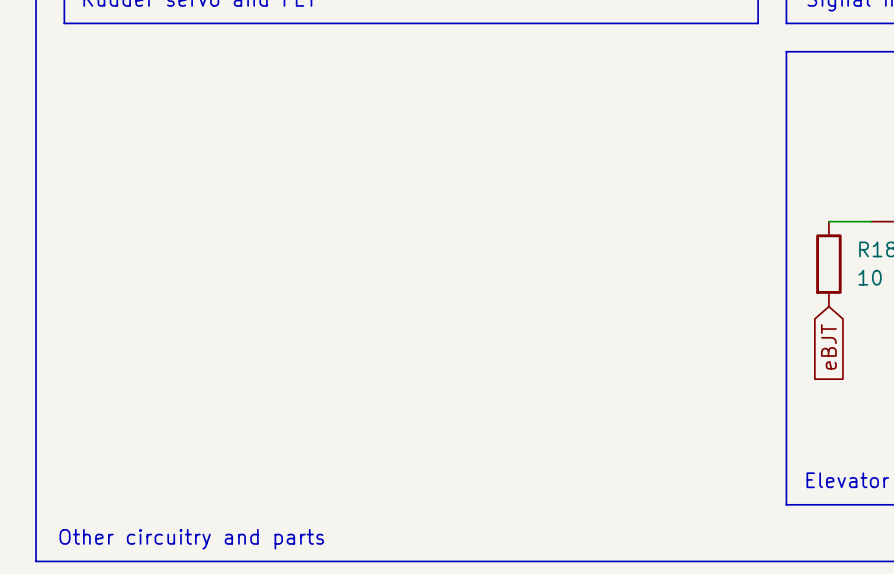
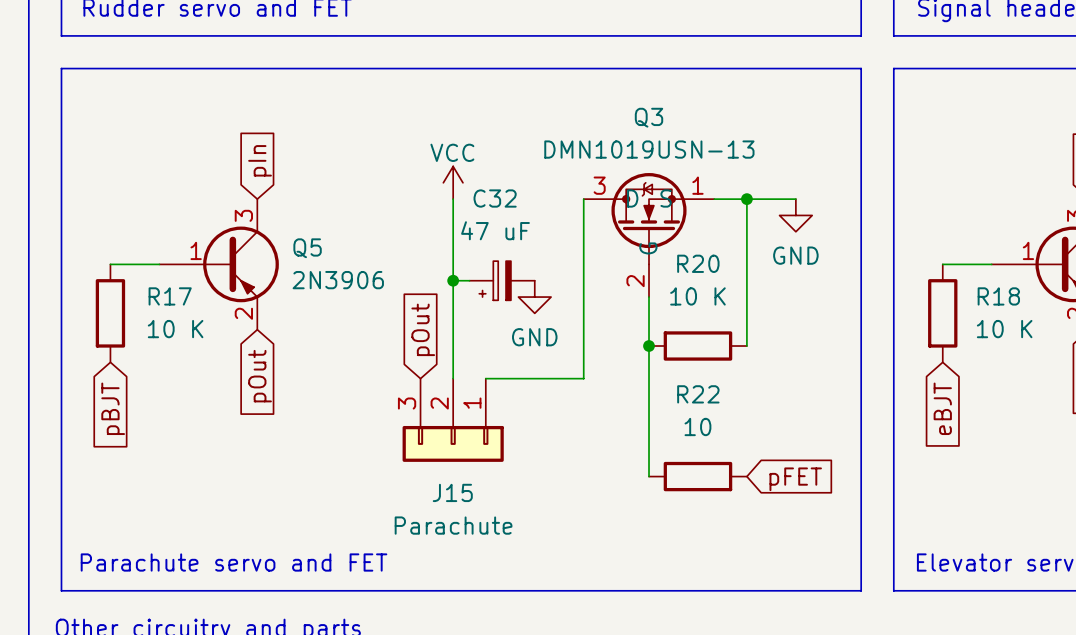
line: none -> (61, 68) (861, 68) (861, 590) (61, 590) (61, 68)
global label: none -> pIn (260, 160)
power symbol: none -> VCC (453, 182)
wire: none -> (453, 199) (453, 378)
wire: none -> (583, 199) (583, 378) (485, 378)
wire: none -> (714, 199) (795, 199)
wire: none -> (746, 199) (746, 346)
junction: none -> (746, 199)
power symbol: none -> GND (795, 215)
Q3: none -> DMN1019USN-13 (649, 235)
wire: none -> (110, 264) (159, 264)
Q5: none -> 2N3906 (219, 264)
wire: none -> (453, 280) (469, 280)
junction: none -> (453, 280)
C32: none -> 47 uF (502, 280)
power symbol: none -> GND (534, 297)
wire: none -> (649, 297) (649, 476)
R17: none -> 10 K (110, 313)
global label: none -> pOut (423, 329)
junction: none -> (649, 346)
R20: none -> 10 K (697, 346)
global label: none -> pOut (260, 376)
global label: none -> pBJT (113, 408)
J15: none -> Parachute (453, 420)
R22: none -> 10 (697, 476)
global label: none -> pFET (795, 479)
text: none -> Parachute servo and FET (234, 562)

